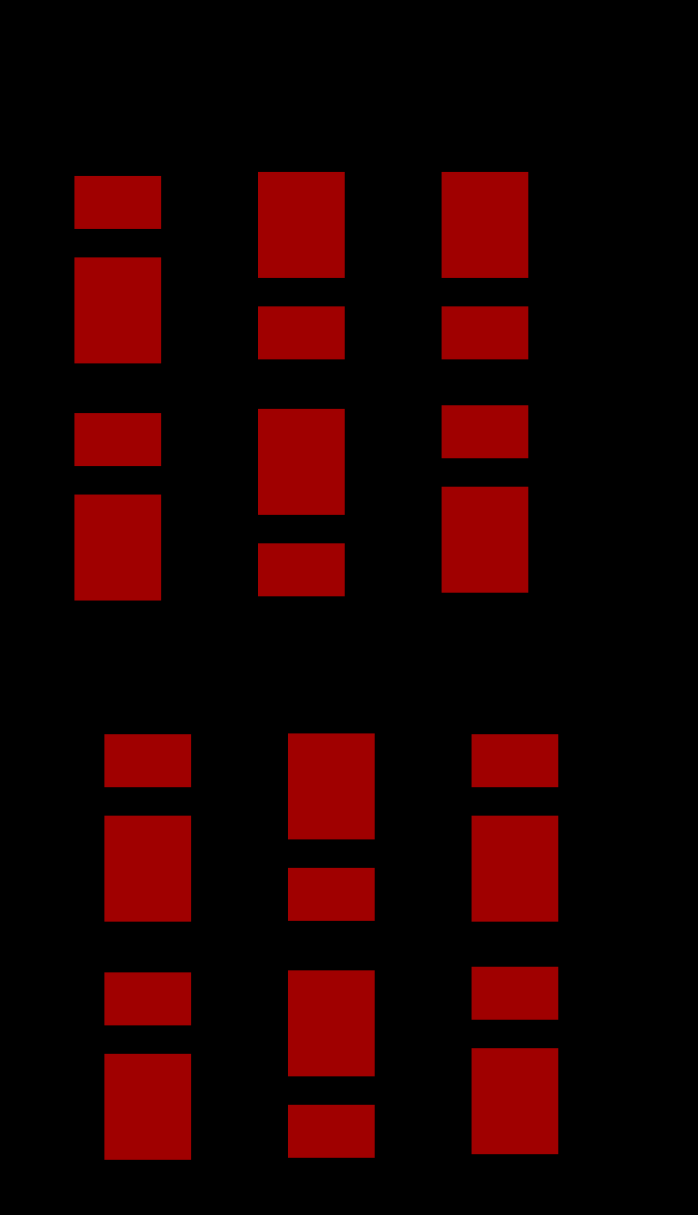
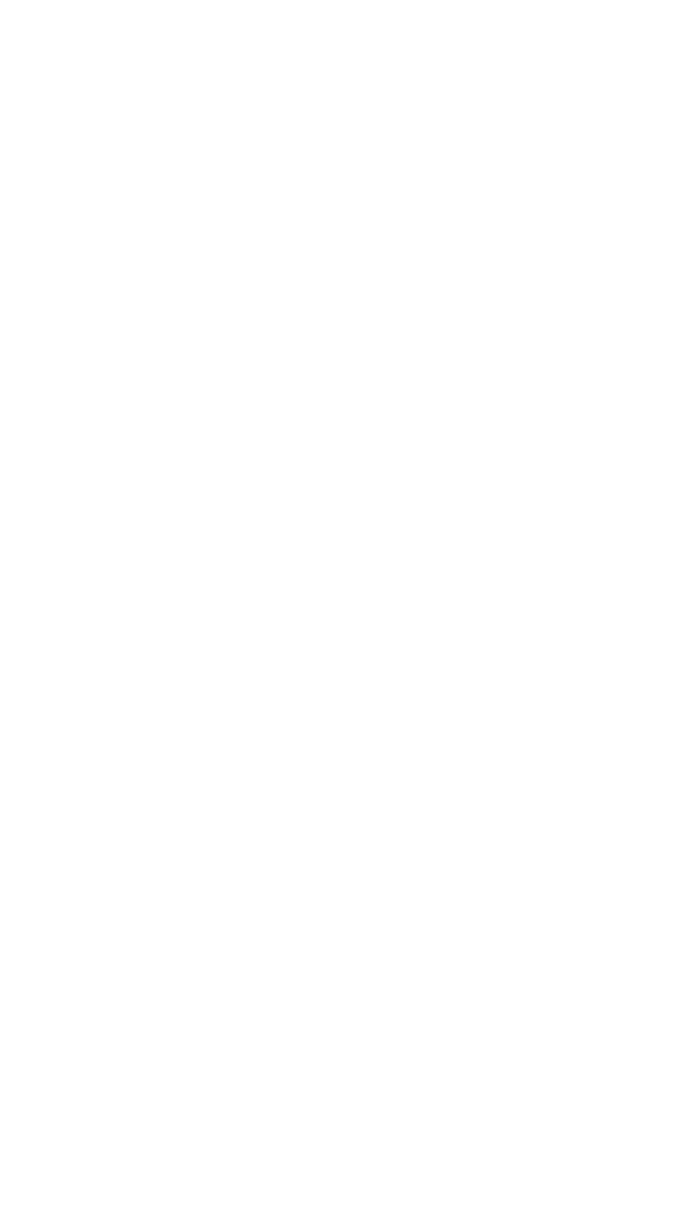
part: (301, 265) -> none
part: (484, 265) -> none
part: (117, 269) -> none
part: (484, 498) -> none
part: (301, 502) -> none
part: (117, 506) -> none
part: (147, 827) -> none
part: (331, 827) -> none
part: (514, 827) -> none
part: (514, 1060) -> none
part: (331, 1064) -> none
part: (147, 1066) -> none

